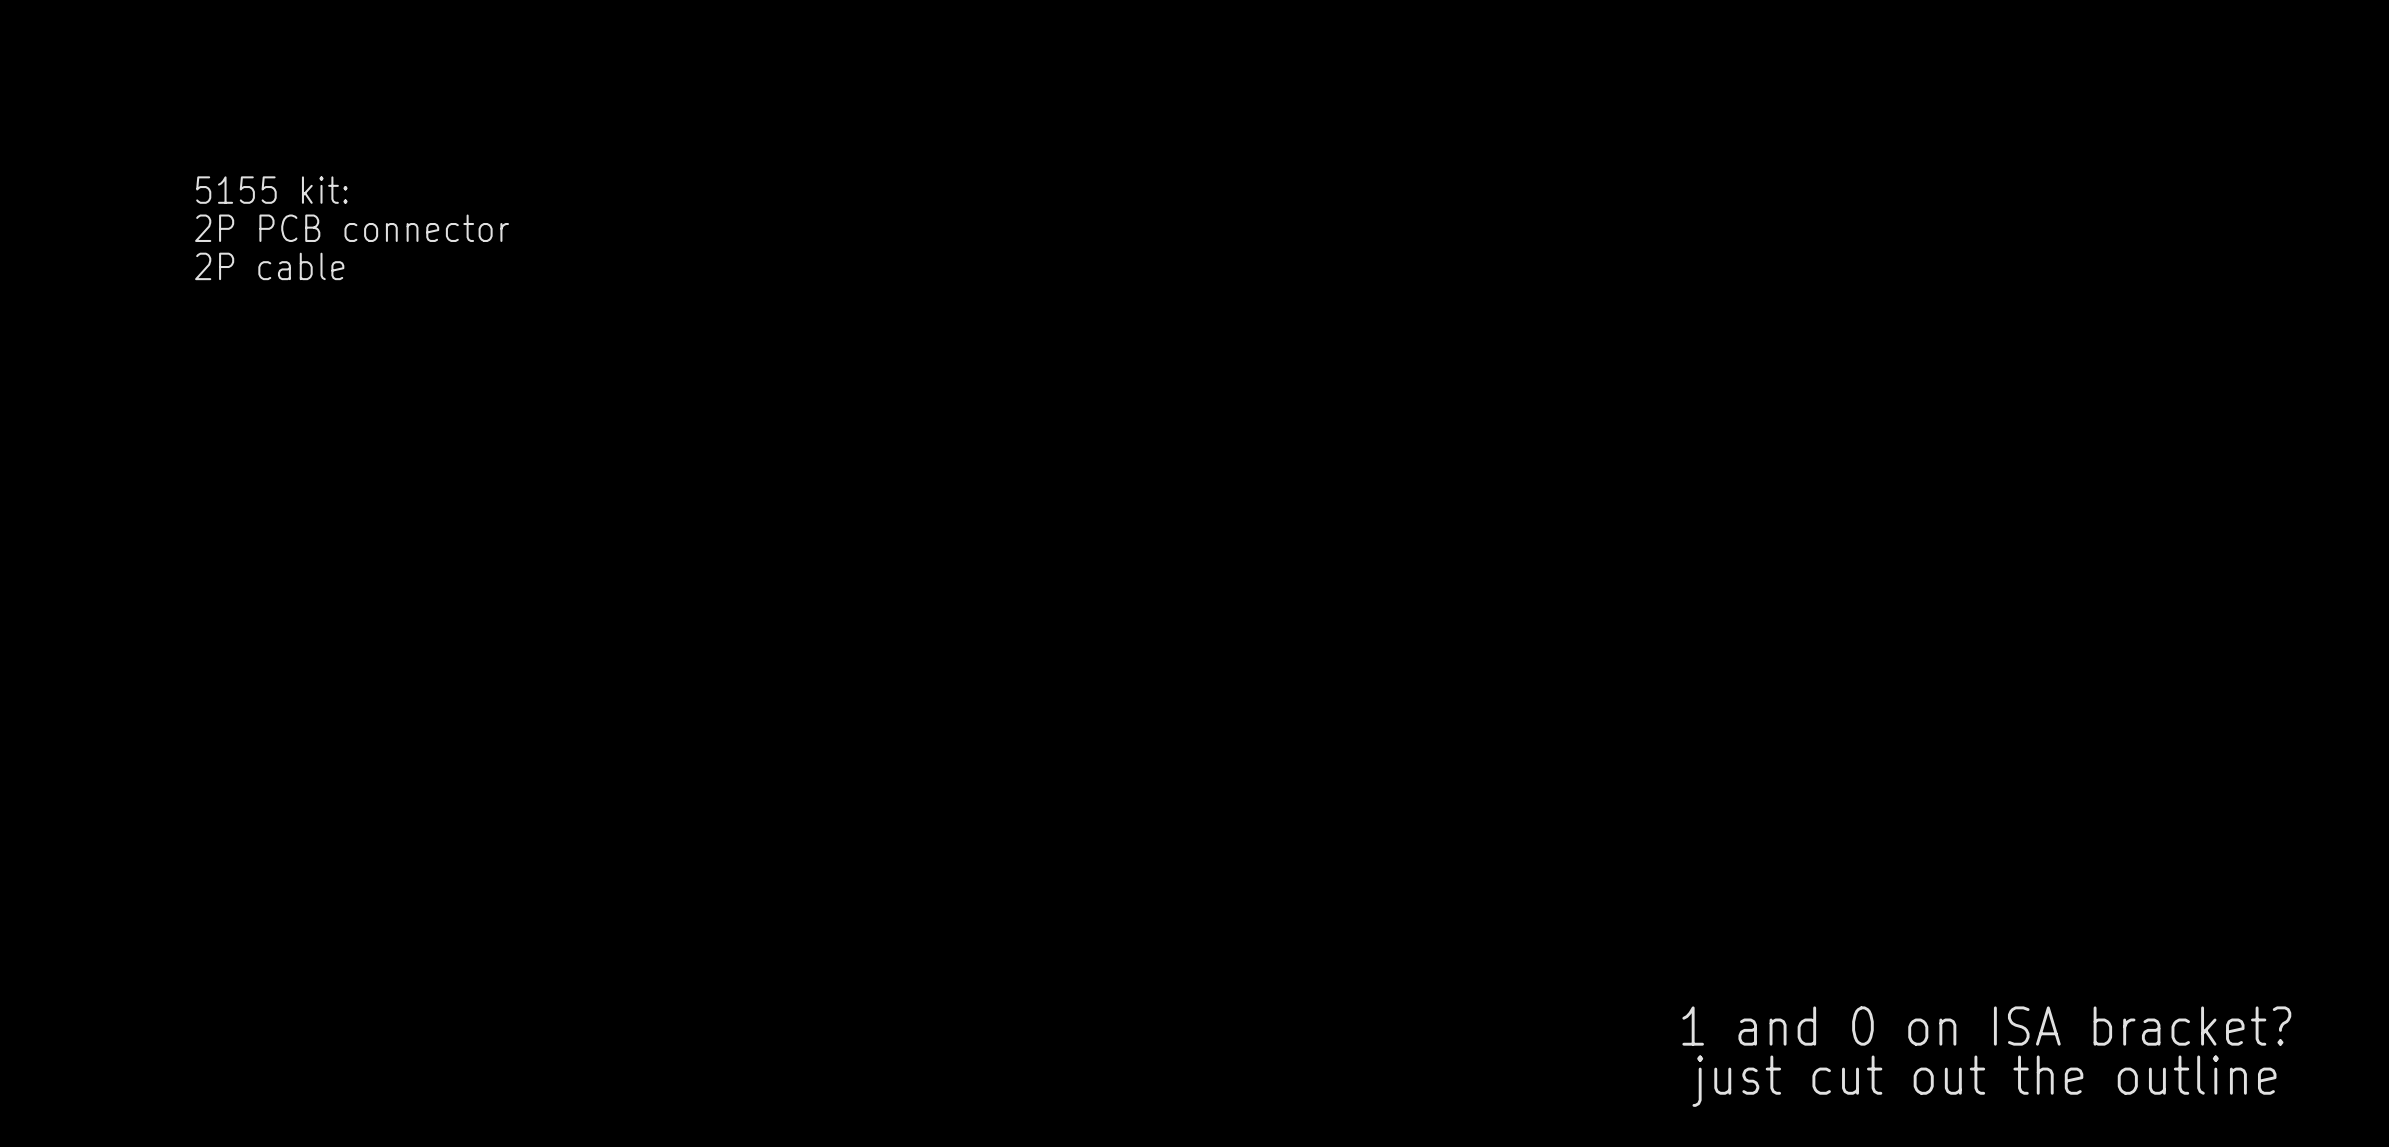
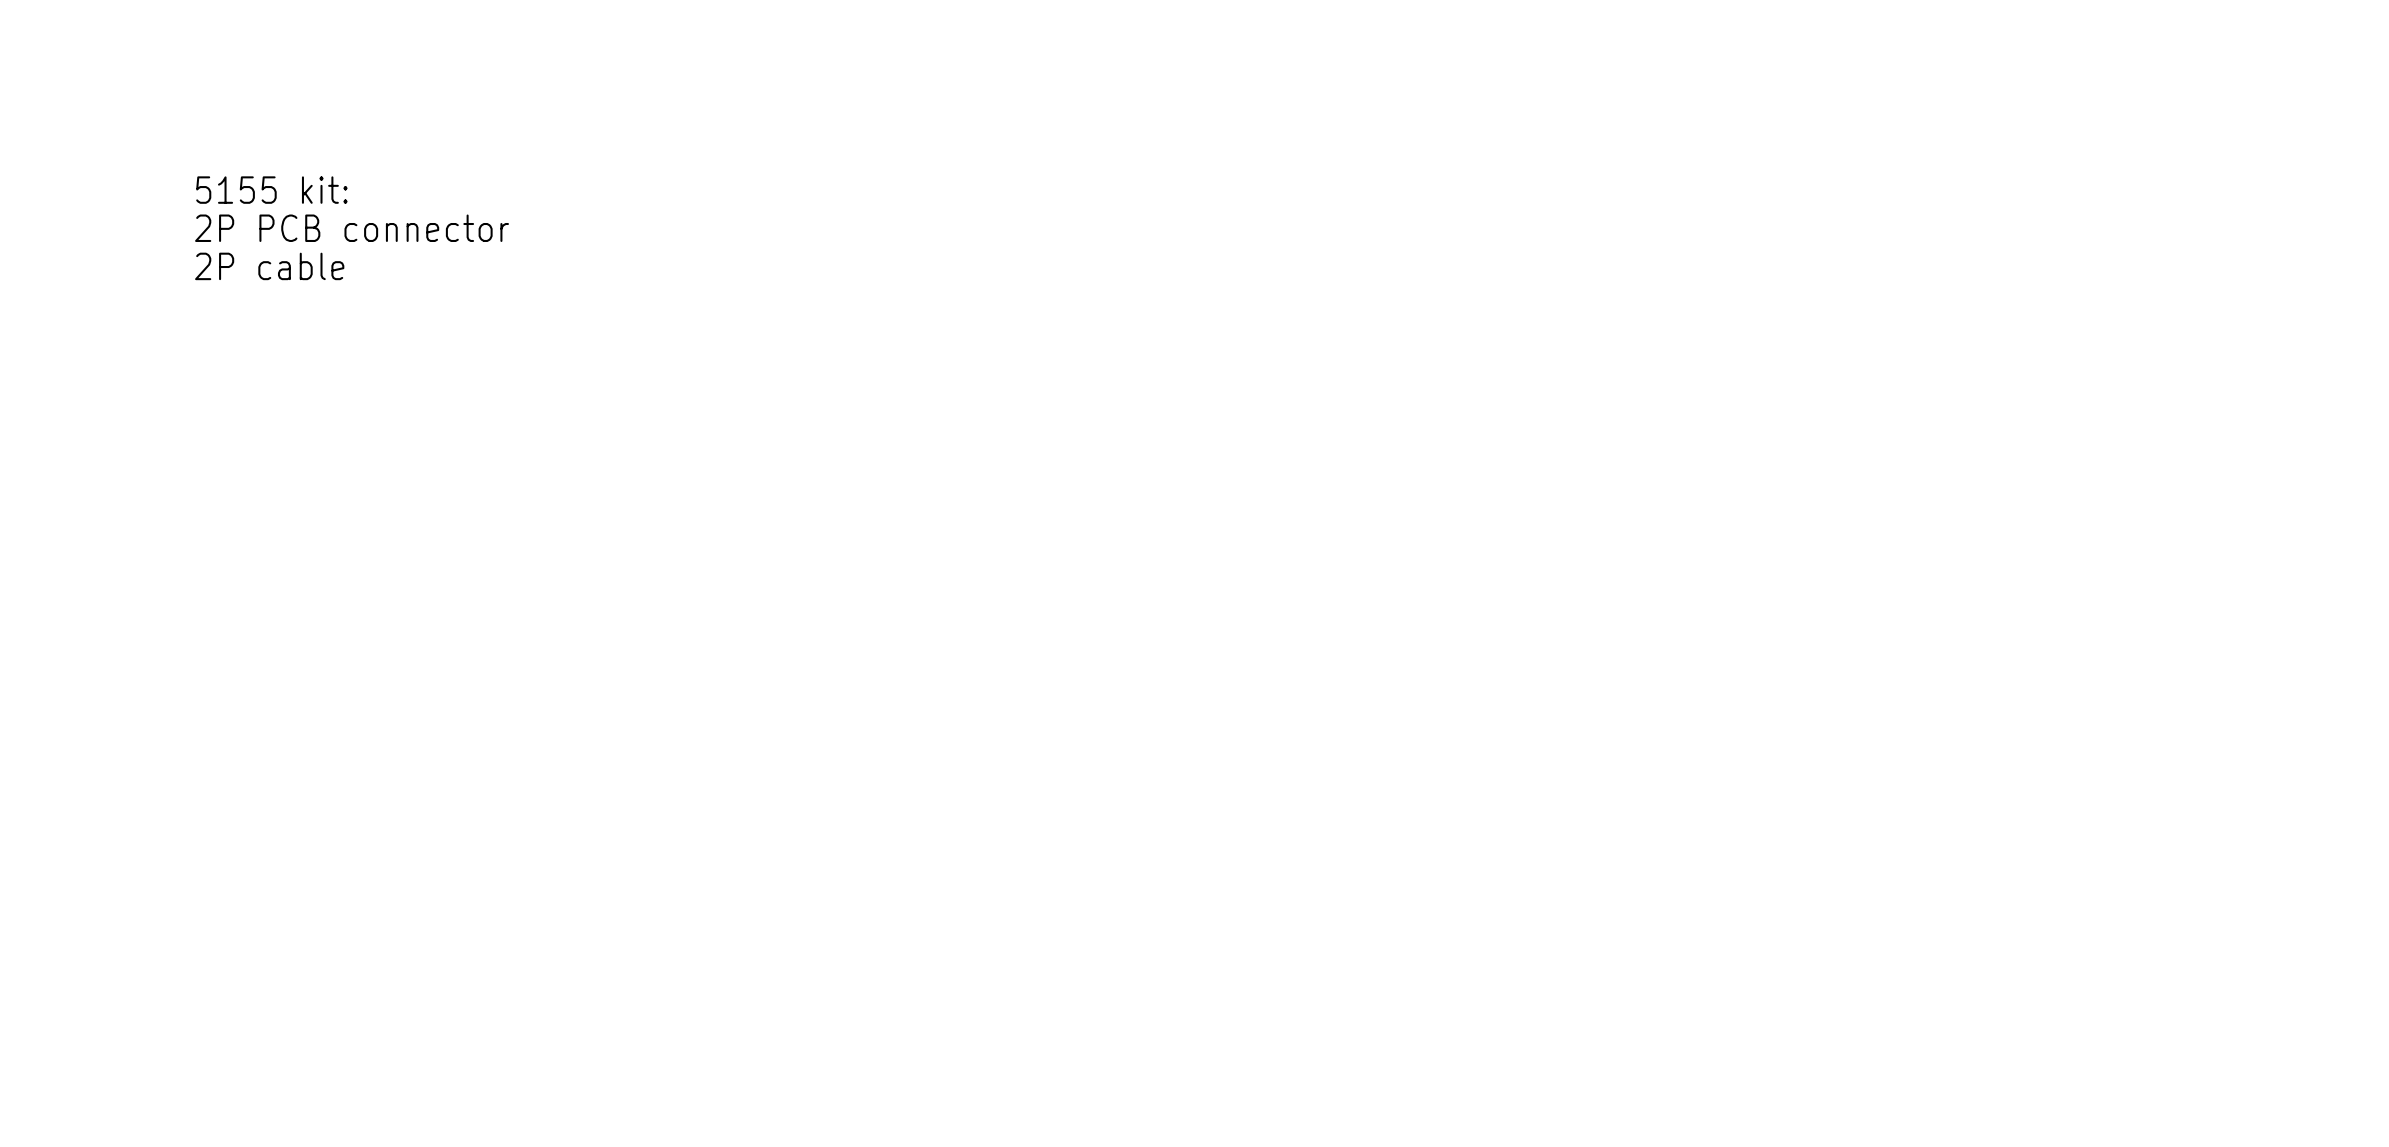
text: 1 and 0 on ISA bracket? (1986, 1026) -> none
text: just cut out the outline (1984, 1081) -> none

